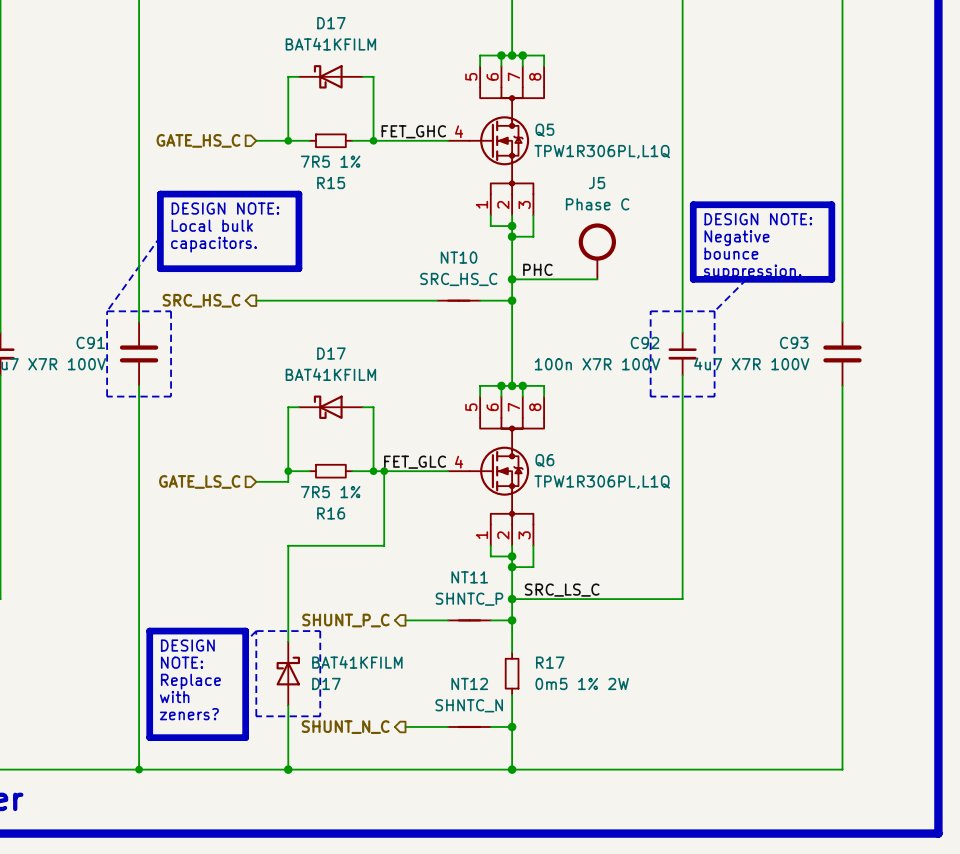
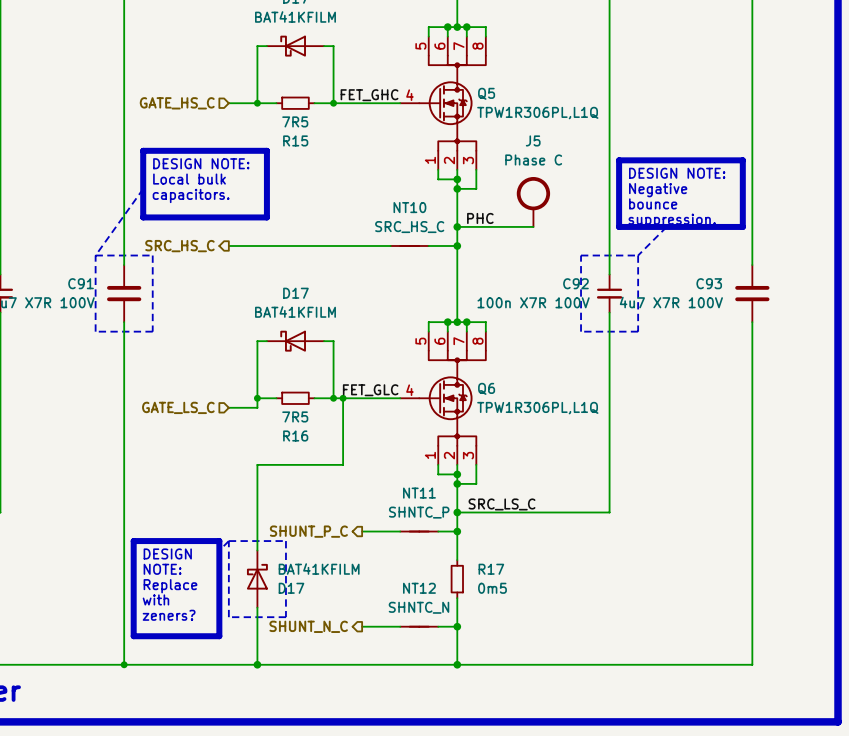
R15 value: 7R5 1% (330, 161) -> 7R5 (295, 121)
R16 value: 7R5 1% (330, 492) -> 7R5 (295, 416)
R17 value: 0m5 1% 2W (582, 683) -> 0m5 (492, 588)

